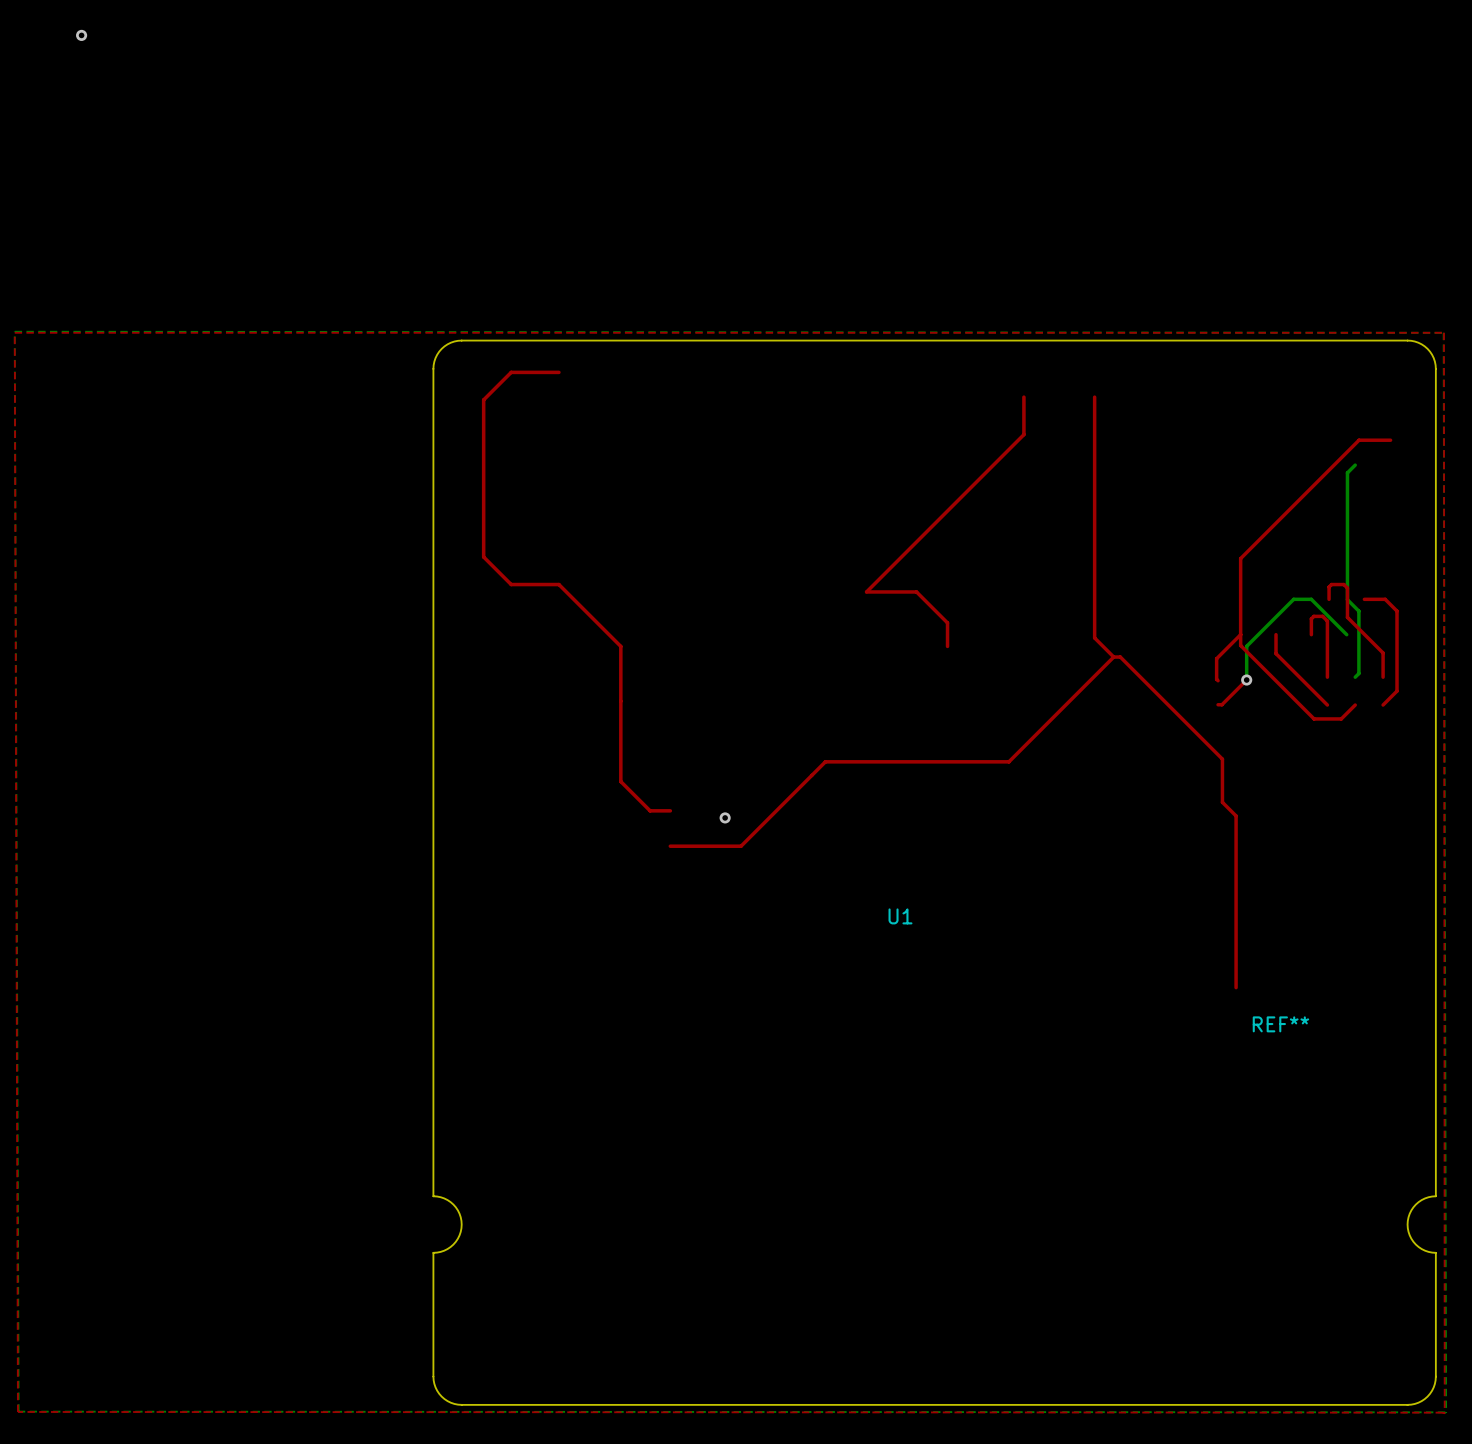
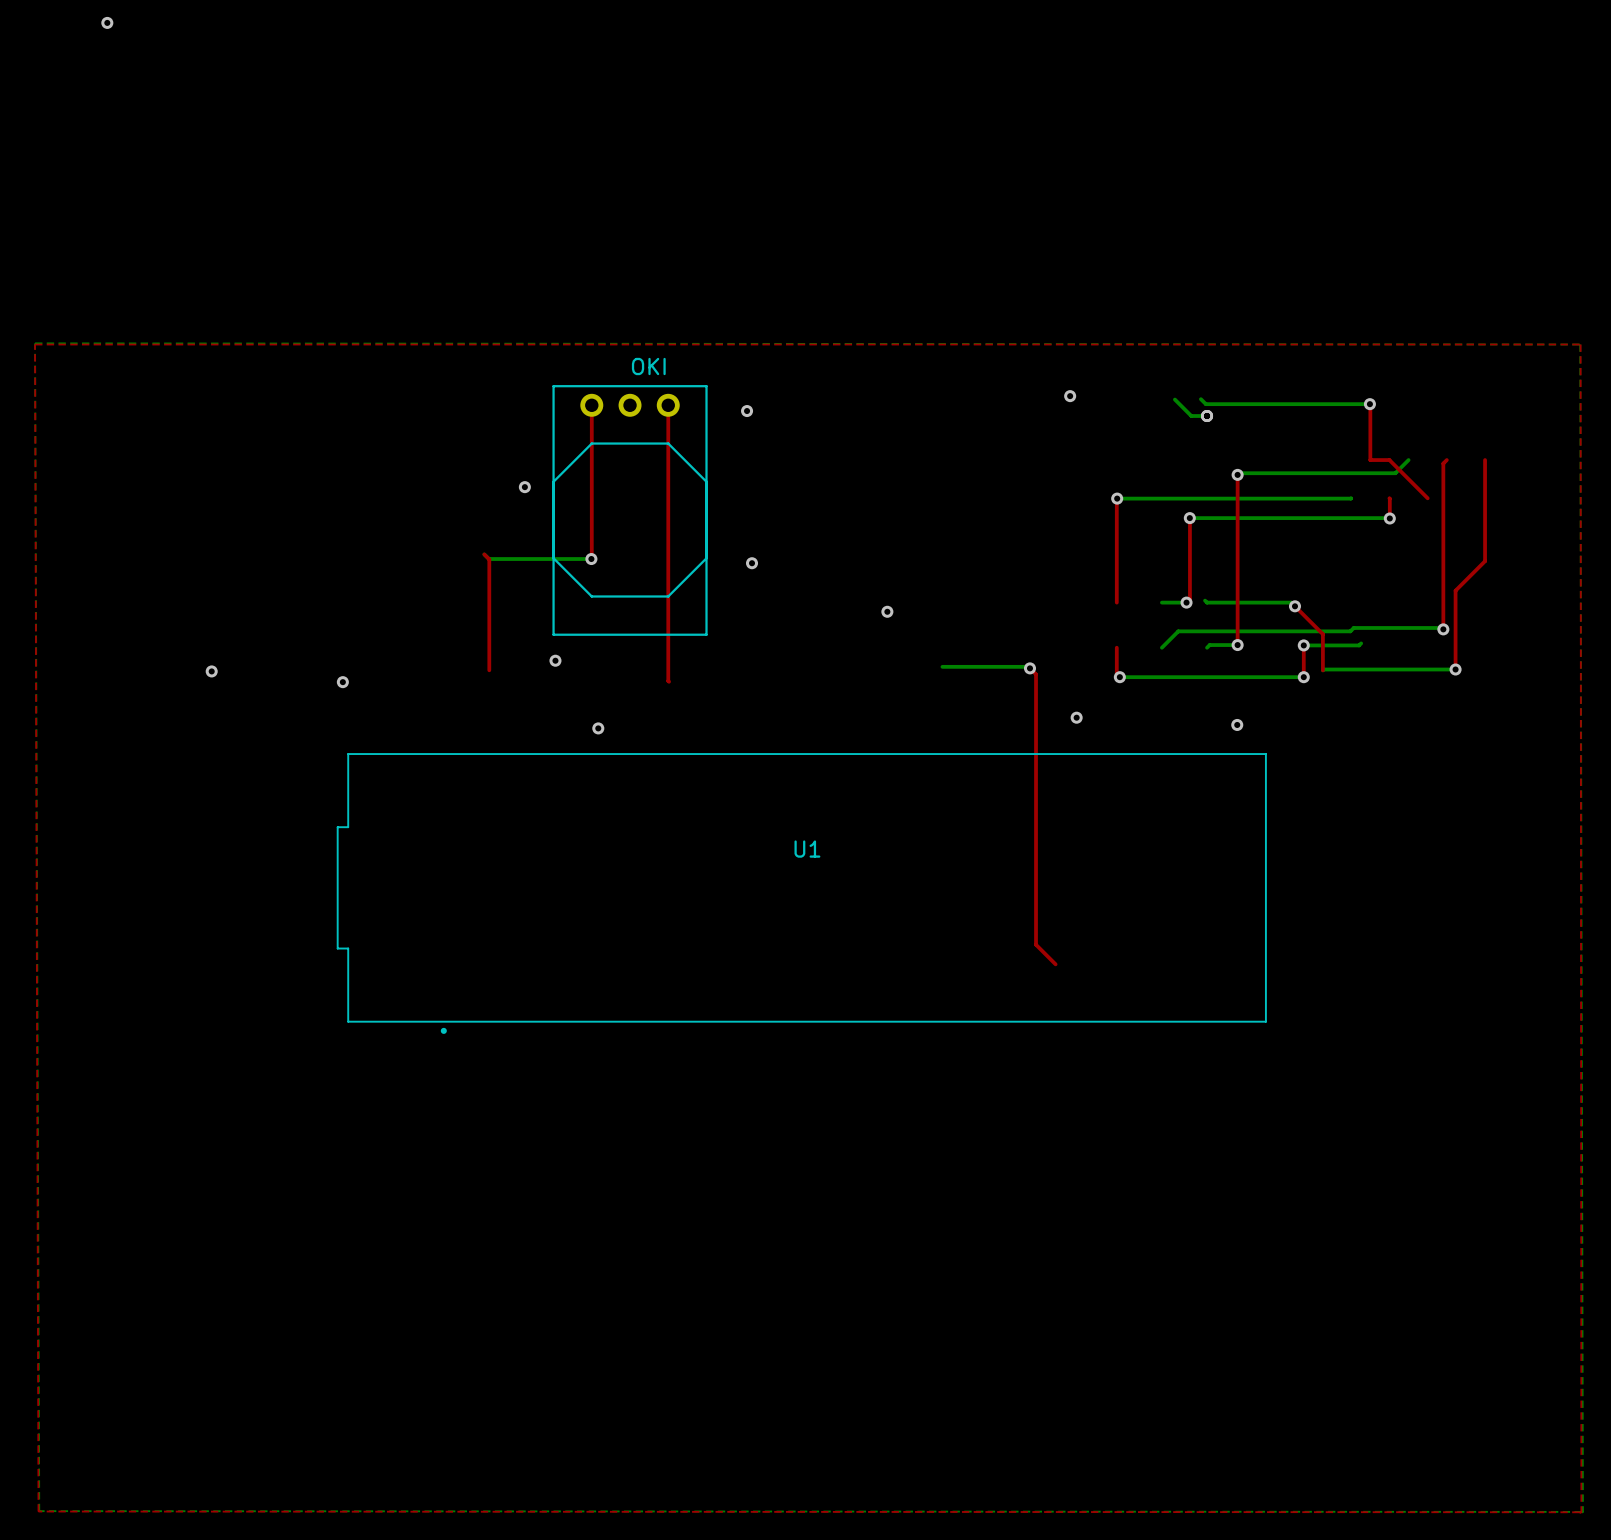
board edge: (1407, 340) (461, 340) (450, 342) (441, 348) (435, 358) (433, 368) (433, 1196) (444, 1198) (453, 1204) (459, 1213) (461, 1224) (459, 1235) (453, 1244) (444, 1250) (433, 1252) (433, 1376) (435, 1387) (441, 1396) (450, 1402) (461, 1404) (1407, 1404) (1418, 1402) (1427, 1396) (1433, 1387) (1435, 1376) (1435, 1252) (1425, 1250) (1415, 1244) (1409, 1235) (1407, 1224) (1409, 1213) (1415, 1204) (1425, 1198) (1435, 1196) (1435, 368) (1433, 358) (1427, 348) (1418, 342) (1407, 340) -> none
top track: (558, 372) (511, 372) (483, 399) (483, 557) (511, 584) (558, 584) (620, 646) (620, 781) (650, 810) (670, 810) -> none
via: none -> (1070, 396)
bottom track: none -> (1174, 399) (1191, 416) (1207, 416)
bottom track: none -> (1200, 399) (1205, 404) (1369, 404)
top track: none -> (1369, 404) (1370, 460) (1389, 460) (1427, 498)
via: none -> (1369, 404)
top track: none -> (591, 405) (591, 559)
top track: none -> (668, 405) (669, 681)
via: none -> (747, 411)
top track: (1023, 397) (1023, 434) (866, 591) (916, 591) (947, 622) (947, 646) -> none
top track: (1094, 397) (1094, 637) (1113, 657) -> none
via: none -> (1207, 416)
bottom track: none -> (1408, 460) (1395, 473) (1239, 473) (1237, 474)
top track: none -> (1446, 460) (1443, 463) (1443, 629)
top track: none -> (1485, 460) (1485, 561) (1455, 590) (1455, 669)
top track: (1390, 440) (1359, 440) (1240, 558) (1240, 645) (1314, 718) (1341, 718) (1355, 705) -> none
top track: none -> (1237, 474) (1237, 645)
via: none -> (1237, 474)
via: none -> (524, 487)
bottom track: (1355, 465) (1347, 472) (1347, 599) (1358, 611) (1358, 673) (1355, 677) -> none
top track: none -> (1117, 498) (1116, 602)
via: none -> (1117, 498)
bottom track: none -> (1351, 498) (1117, 498)
top track: none -> (1389, 498) (1389, 518)
part: none -> OKI (630, 510)
top track: none -> (1189, 518) (1189, 599) (1186, 602)
bottom track: none -> (1189, 518) (1389, 518)
via: none -> (1189, 518)
via: none -> (1389, 518)
top track: none -> (484, 554) (489, 559) (489, 670)
bottom track: none -> (484, 554) (488, 559) (591, 559)
via: none -> (591, 559)
via: none -> (752, 563)
bottom track: none -> (1205, 600) (1207, 602) (1291, 602) (1294, 606)
bottom track: none -> (1161, 602) (1186, 602)
via: none -> (1186, 602)
top track: none -> (1294, 606) (1322, 634) (1322, 670)
via: none -> (1294, 606)
via: none -> (887, 611)
bottom track: none -> (1443, 629) (1353, 627) (1350, 631) (1178, 631) (1161, 647)
via: none -> (1443, 629)
top track: (1329, 599) (1329, 587) (1331, 584) (1343, 584) (1347, 588) (1347, 617) (1383, 653) (1383, 677) -> none
top track: (1364, 599) (1385, 599) (1397, 611) (1397, 691) (1383, 705) -> none
bottom track: none -> (1361, 643) (1359, 645) (1303, 645)
bottom track: none -> (1237, 645) (1209, 645) (1207, 647)
via: none -> (1237, 645)
top track: none -> (1303, 645) (1303, 677)
via: none -> (1303, 645)
top track: none -> (1116, 647) (1116, 674) (1119, 677)
via: none -> (555, 660)
bottom track: none -> (942, 666) (1028, 666) (1030, 668)
top track: none -> (1030, 668) (1036, 674) (1036, 944) (1055, 964)
via: none -> (1030, 668)
bottom track: none -> (1455, 669) (1322, 670)
via: none -> (1455, 669)
top track: (1240, 634) (1216, 658) (1218, 680) -> none
top track: (1276, 634) (1276, 653) (1327, 705) -> none
top track: (1311, 634) (1311, 618) (1313, 616) (1322, 616) (1327, 621) (1327, 677) -> none
bottom track: (1346, 634) (1311, 599) (1293, 599) (1246, 646) (1246, 680) -> none
via: none -> (211, 671)
bottom track: none -> (1119, 677) (1303, 677)
via: none -> (1119, 677)
via: none -> (1303, 677)
via: none -> (342, 682)
top track: (1113, 657) (1008, 761) (825, 761) (741, 846) (670, 846) -> none
top track: (1113, 657) (1120, 657) (1222, 759) (1222, 802) (1236, 815) (1236, 987) -> none
via: none -> (1076, 717)
top track: (1246, 680) (1221, 704) (1218, 704) -> none
via: (1246, 680) -> none
via: none -> (1237, 724)
via: none -> (598, 728)
via: (725, 817) -> none
U1 footprint: [888, 908, 1310, 1033] -> [336, 753, 1267, 1034]
U1 name position: U1 (900, 916) -> U1 (807, 849)

